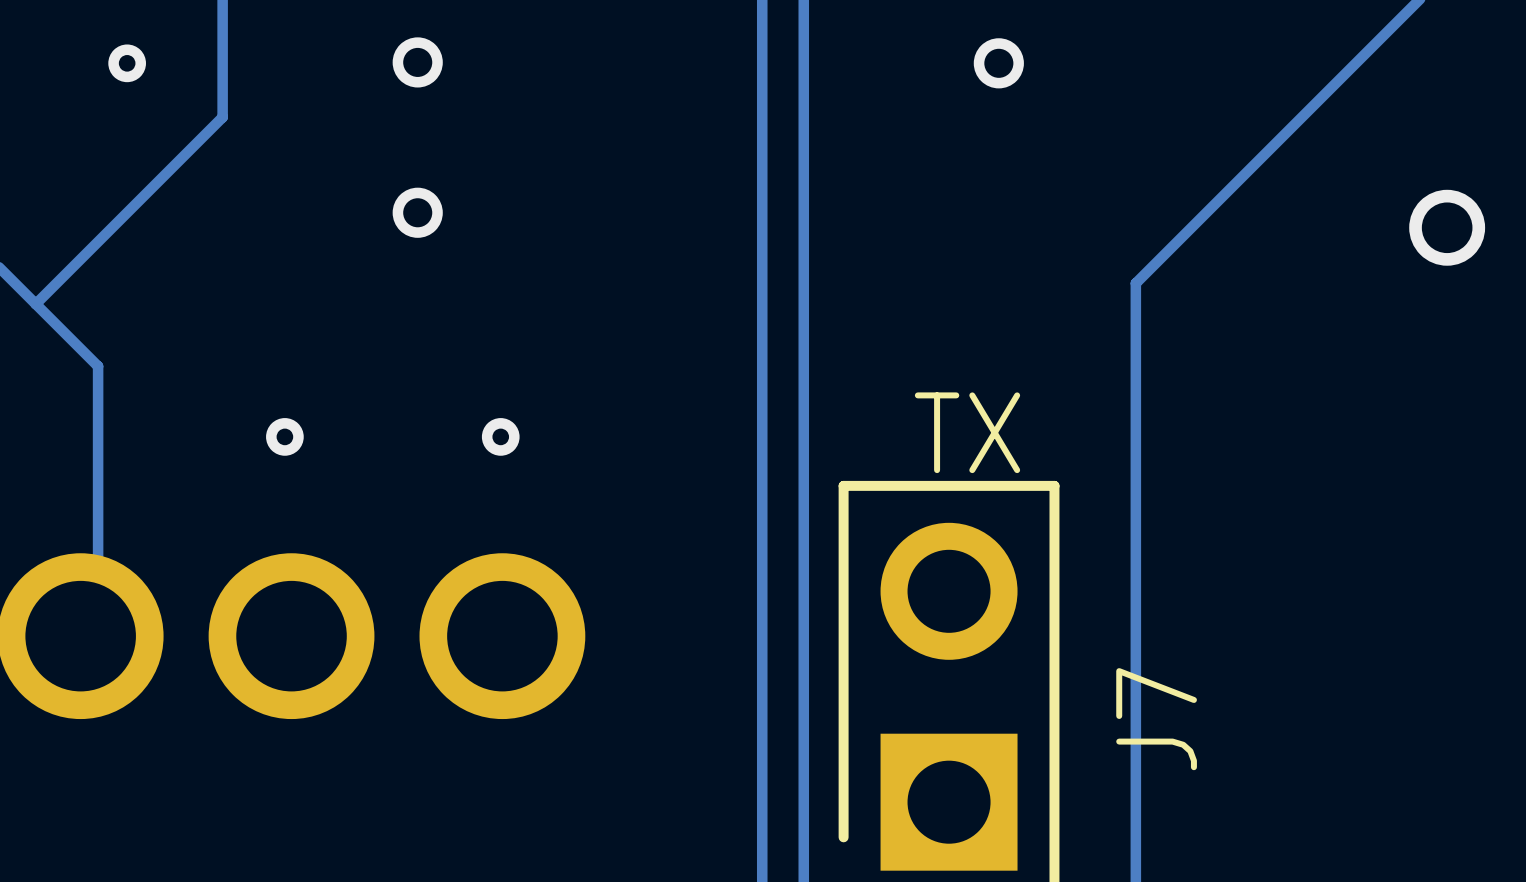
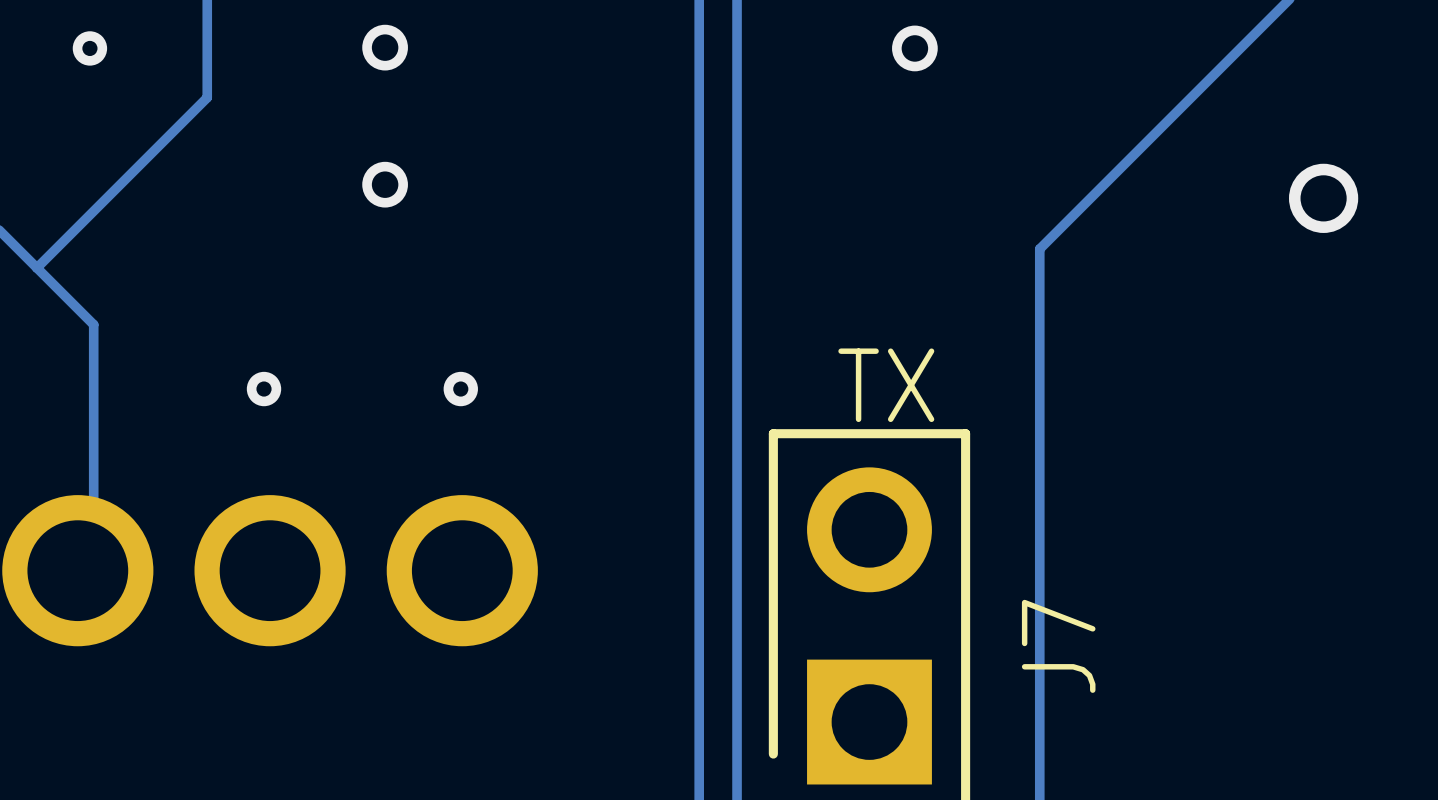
via position: (127, 63) -> (89, 48)

